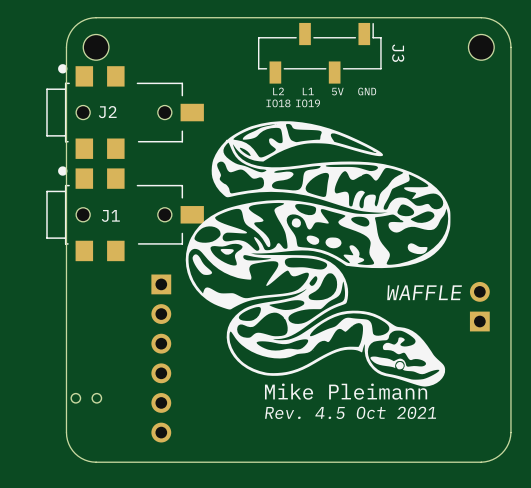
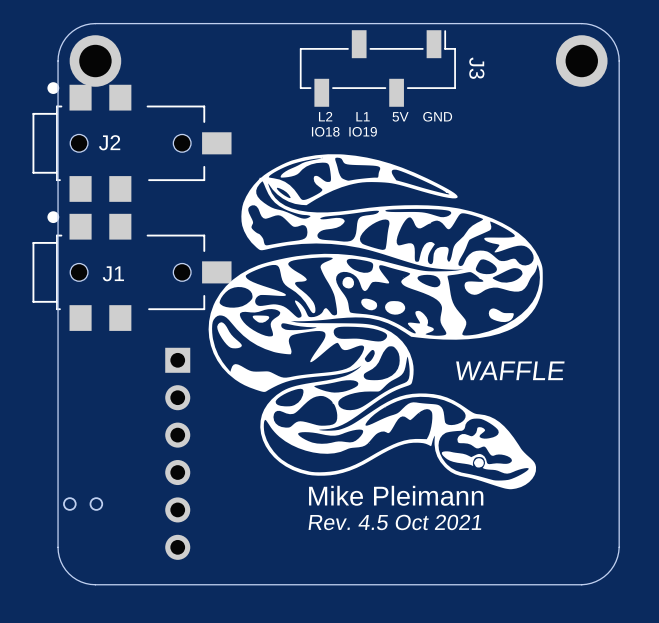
part footprint: [83, 34, 109, 61] -> [69, 35, 122, 87]
part footprint: [468, 34, 495, 61] -> [555, 35, 608, 87]
part: (479, 306) -> none

